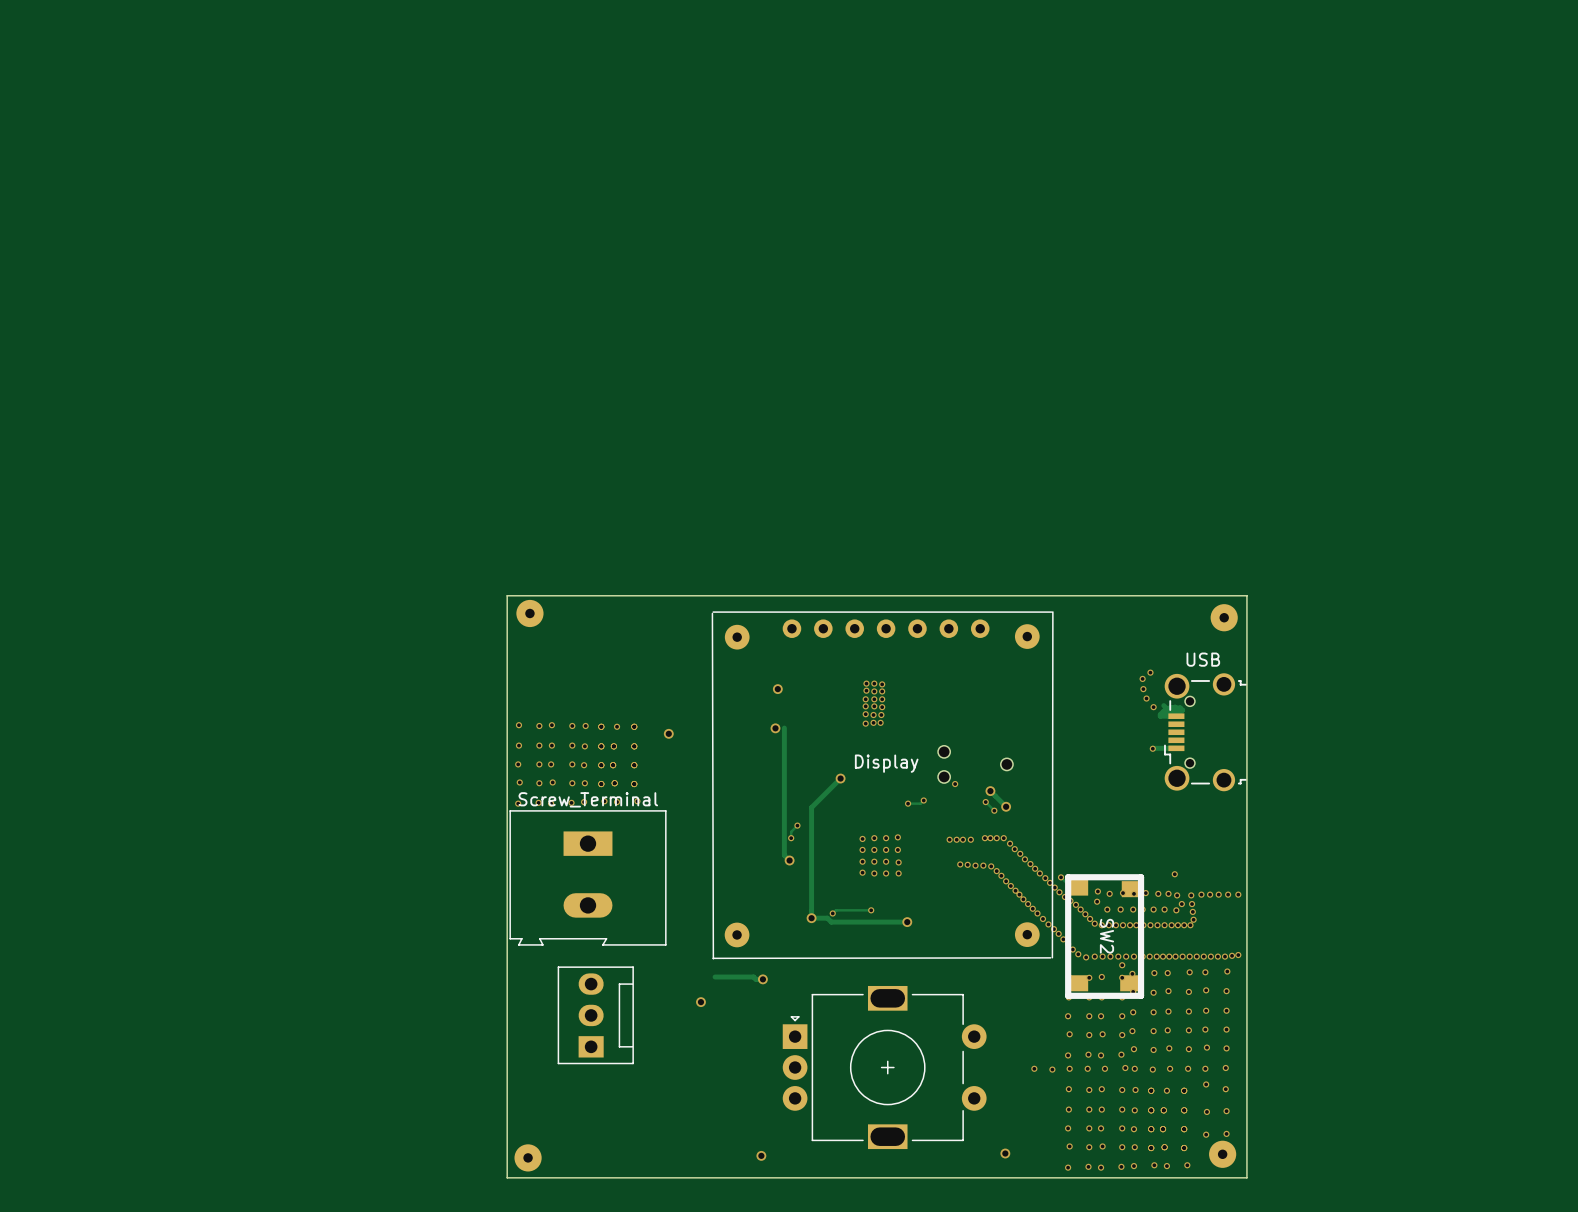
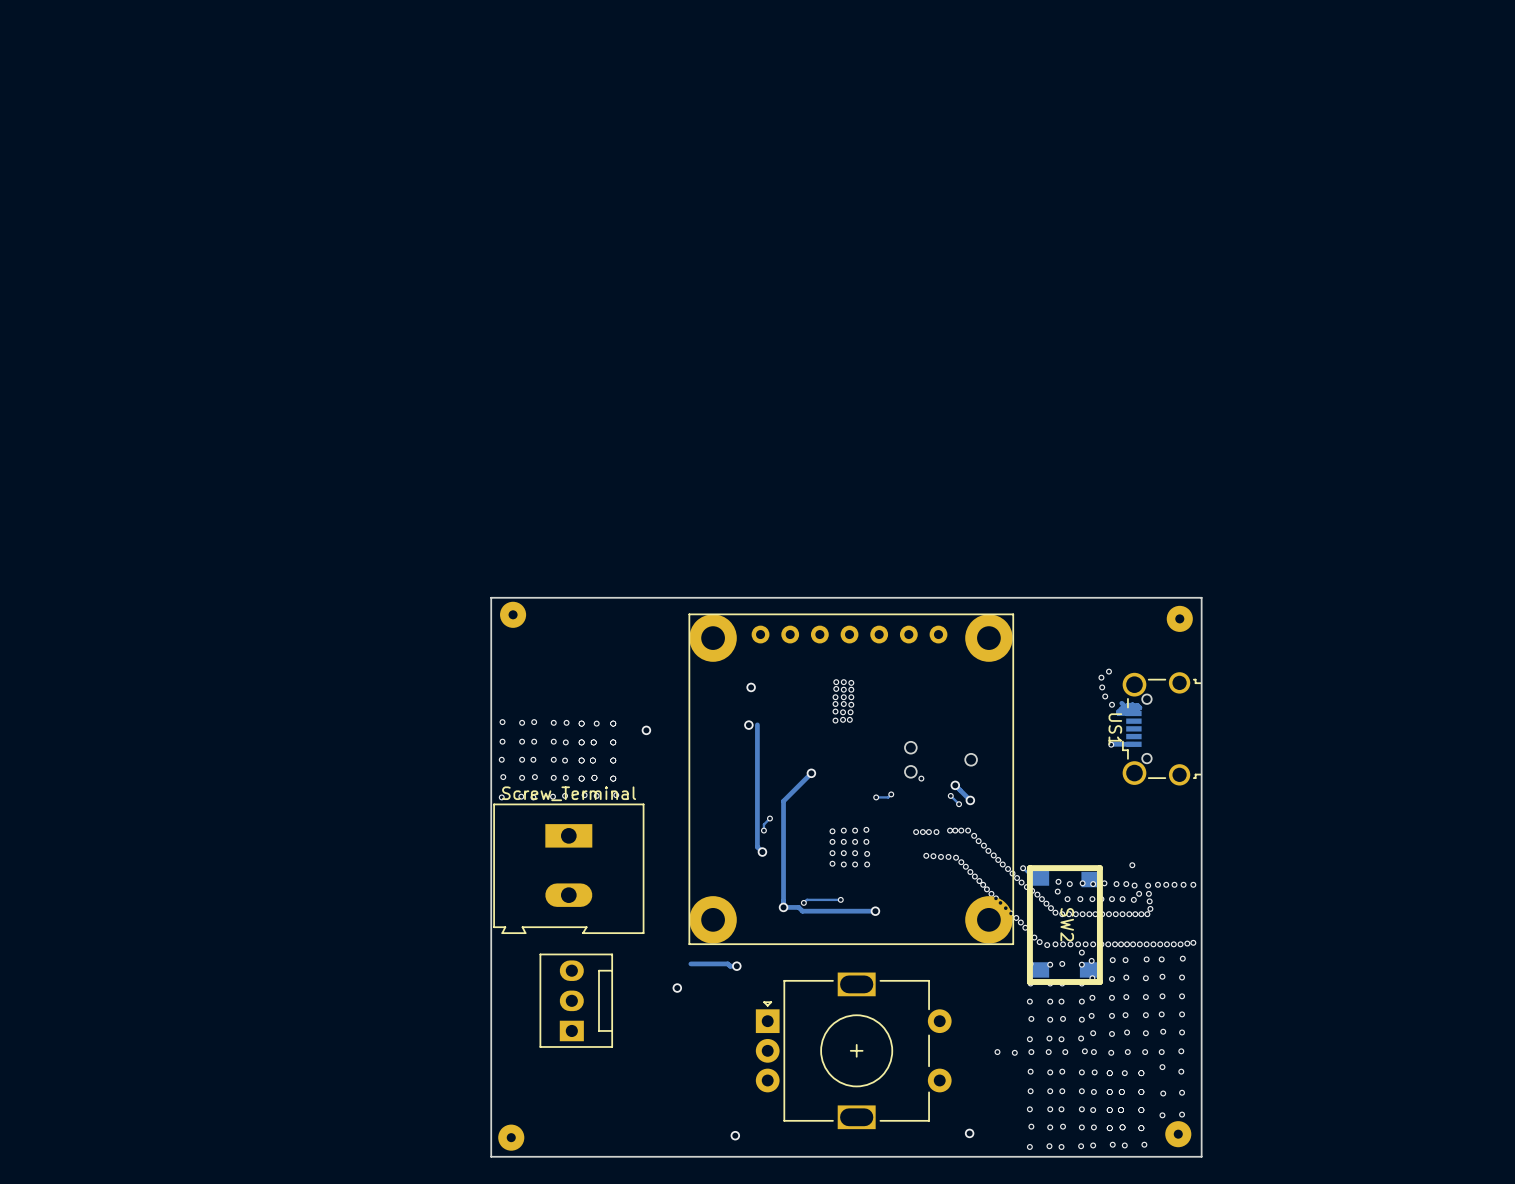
USB name: USB (1203, 659) -> US1 (1115, 729)
part: none -> (851, 779)
Display: (882, 785) -> none

